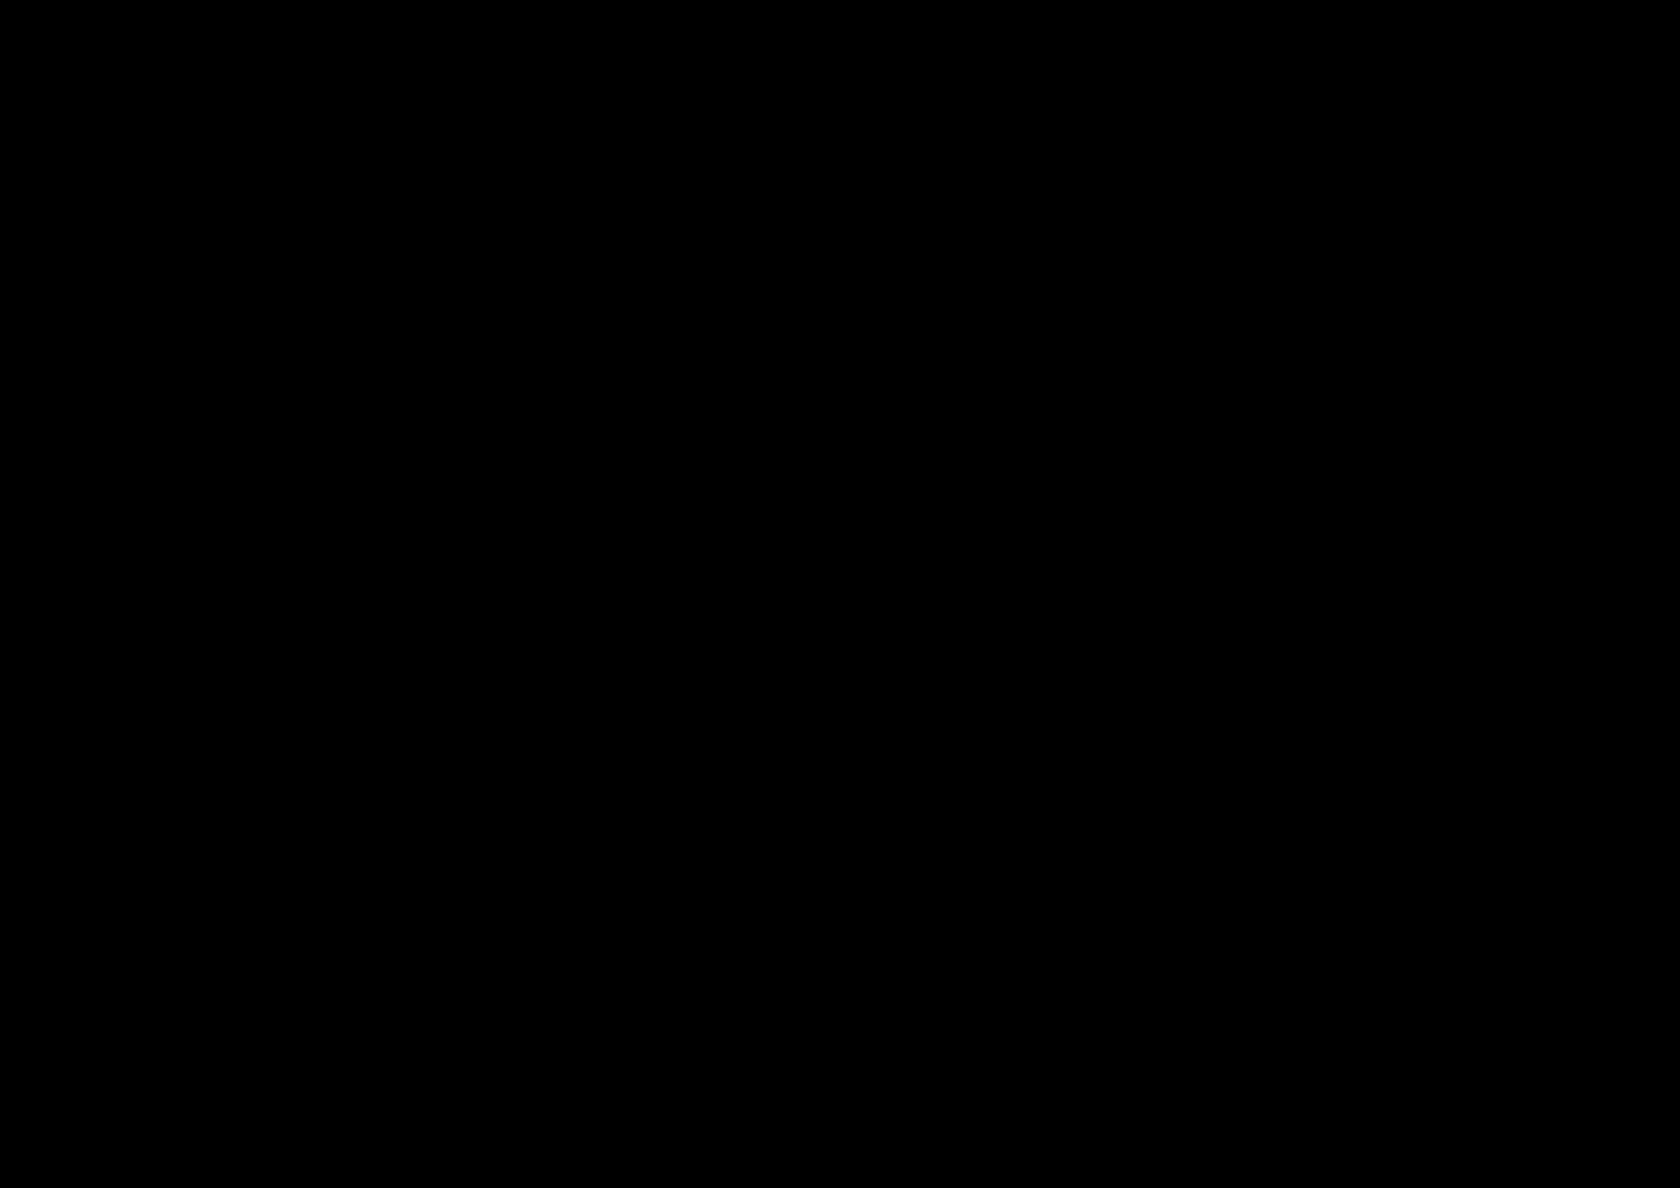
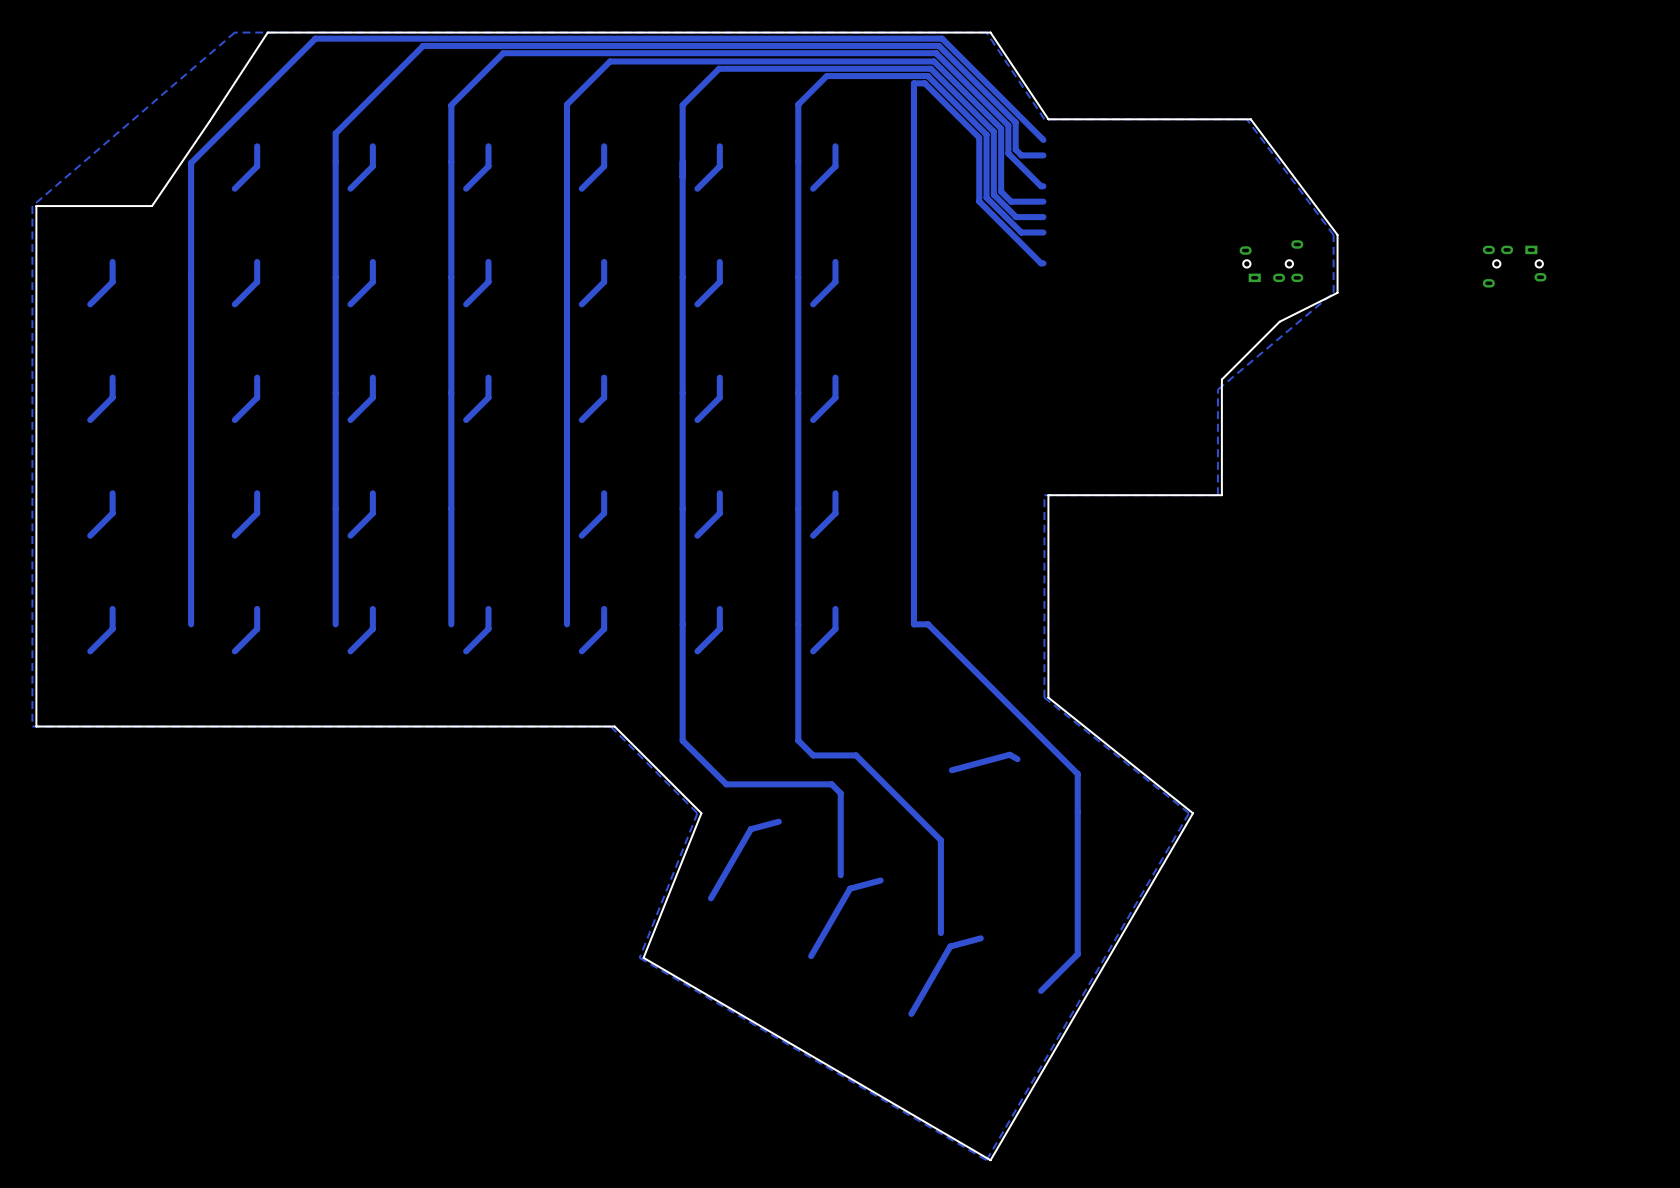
zone outline: none -> (986, 32) (1044, 119) (1246, 119) (1333, 234) (1333, 292) (1217, 389) (1217, 495) (1044, 495) (1044, 697) (1189, 813) (986, 1160) (639, 957) (697, 813) (610, 726) (32, 726) (32, 206) (234, 32) (986, 32)
board edge: none -> (990, 32) (1048, 119) (1250, 119) (1337, 234) (1337, 292) (1279, 321) (1221, 379) (1221, 495) (1048, 495) (1048, 697) (1192, 813) (990, 1160) (643, 957) (701, 813) (614, 726) (36, 726) (36, 206) (152, 206) (267, 32) (990, 32)
track: none -> (1043, 140) (942, 38) (315, 38) (191, 163) (191, 624)
track: none -> (257, 146) (257, 166) (234, 188)
track: none -> (372, 146) (372, 166) (350, 188)
track: none -> (488, 146) (488, 166) (466, 188)
track: none -> (604, 146) (604, 166) (581, 188)
track: none -> (719, 146) (719, 166) (697, 188)
track: none -> (835, 146) (835, 166) (813, 188)
track: none -> (1043, 155) (1021, 155) (1015, 149) (1015, 122) (939, 45) (423, 45) (335, 133) (335, 624)
track: none -> (1043, 186) (1041, 186) (1008, 153) (1008, 125) (936, 53) (503, 53) (451, 105) (451, 624)
track: none -> (1043, 201) (1011, 201) (1001, 191) (1001, 128) (934, 61) (610, 61) (566, 104) (566, 624)
track: none -> (1043, 217) (1016, 217) (993, 194) (993, 131) (930, 68) (719, 68) (682, 105) (682, 740) (726, 784) (831, 784) (840, 793) (840, 875)
track: none -> (1043, 232) (1021, 232) (986, 197) (986, 134) (927, 76) (826, 76) (798, 104) (798, 740) (813, 755) (856, 755) (940, 840) (940, 933)
track: none -> (112, 261) (112, 282) (90, 304)
track: none -> (257, 261) (257, 282) (234, 304)
track: none -> (372, 261) (372, 282) (350, 304)
track: none -> (488, 261) (488, 282) (466, 304)
track: none -> (604, 261) (604, 282) (581, 304)
track: none -> (719, 261) (719, 282) (697, 304)
track: none -> (835, 261) (835, 282) (813, 304)
part: none -> (1271, 261)
track: none -> (1043, 263) (1041, 263) (979, 201) (979, 137) (924, 83) (913, 83) (913, 624) (928, 624) (1077, 773) (1077, 954) (1041, 990)
part: none -> (1514, 266)
track: none -> (112, 377) (112, 397) (90, 420)
track: none -> (257, 377) (257, 397) (234, 420)
track: none -> (372, 377) (372, 397) (350, 420)
track: none -> (488, 377) (488, 397) (466, 420)
track: none -> (604, 377) (604, 397) (581, 420)
track: none -> (719, 377) (719, 397) (697, 420)
track: none -> (835, 377) (835, 397) (813, 420)
track: none -> (112, 493) (112, 513) (90, 535)
track: none -> (257, 493) (257, 513) (234, 535)
track: none -> (372, 493) (372, 513) (350, 535)
track: none -> (604, 493) (604, 513) (581, 535)
track: none -> (719, 493) (719, 513) (697, 535)
track: none -> (835, 493) (835, 513) (813, 535)
track: none -> (112, 608) (112, 628) (90, 651)
track: none -> (257, 608) (257, 628) (234, 651)
track: none -> (372, 608) (372, 628) (350, 651)
track: none -> (488, 608) (488, 628) (466, 651)
track: none -> (604, 608) (604, 628) (581, 651)
track: none -> (719, 608) (719, 628) (697, 651)
track: none -> (835, 608) (835, 628) (813, 651)
track: none -> (1017, 759) (1009, 754) (951, 770)
track: none -> (778, 821) (750, 829) (711, 898)
track: none -> (880, 880) (850, 888) (811, 956)
track: none -> (980, 938) (950, 946) (911, 1013)

